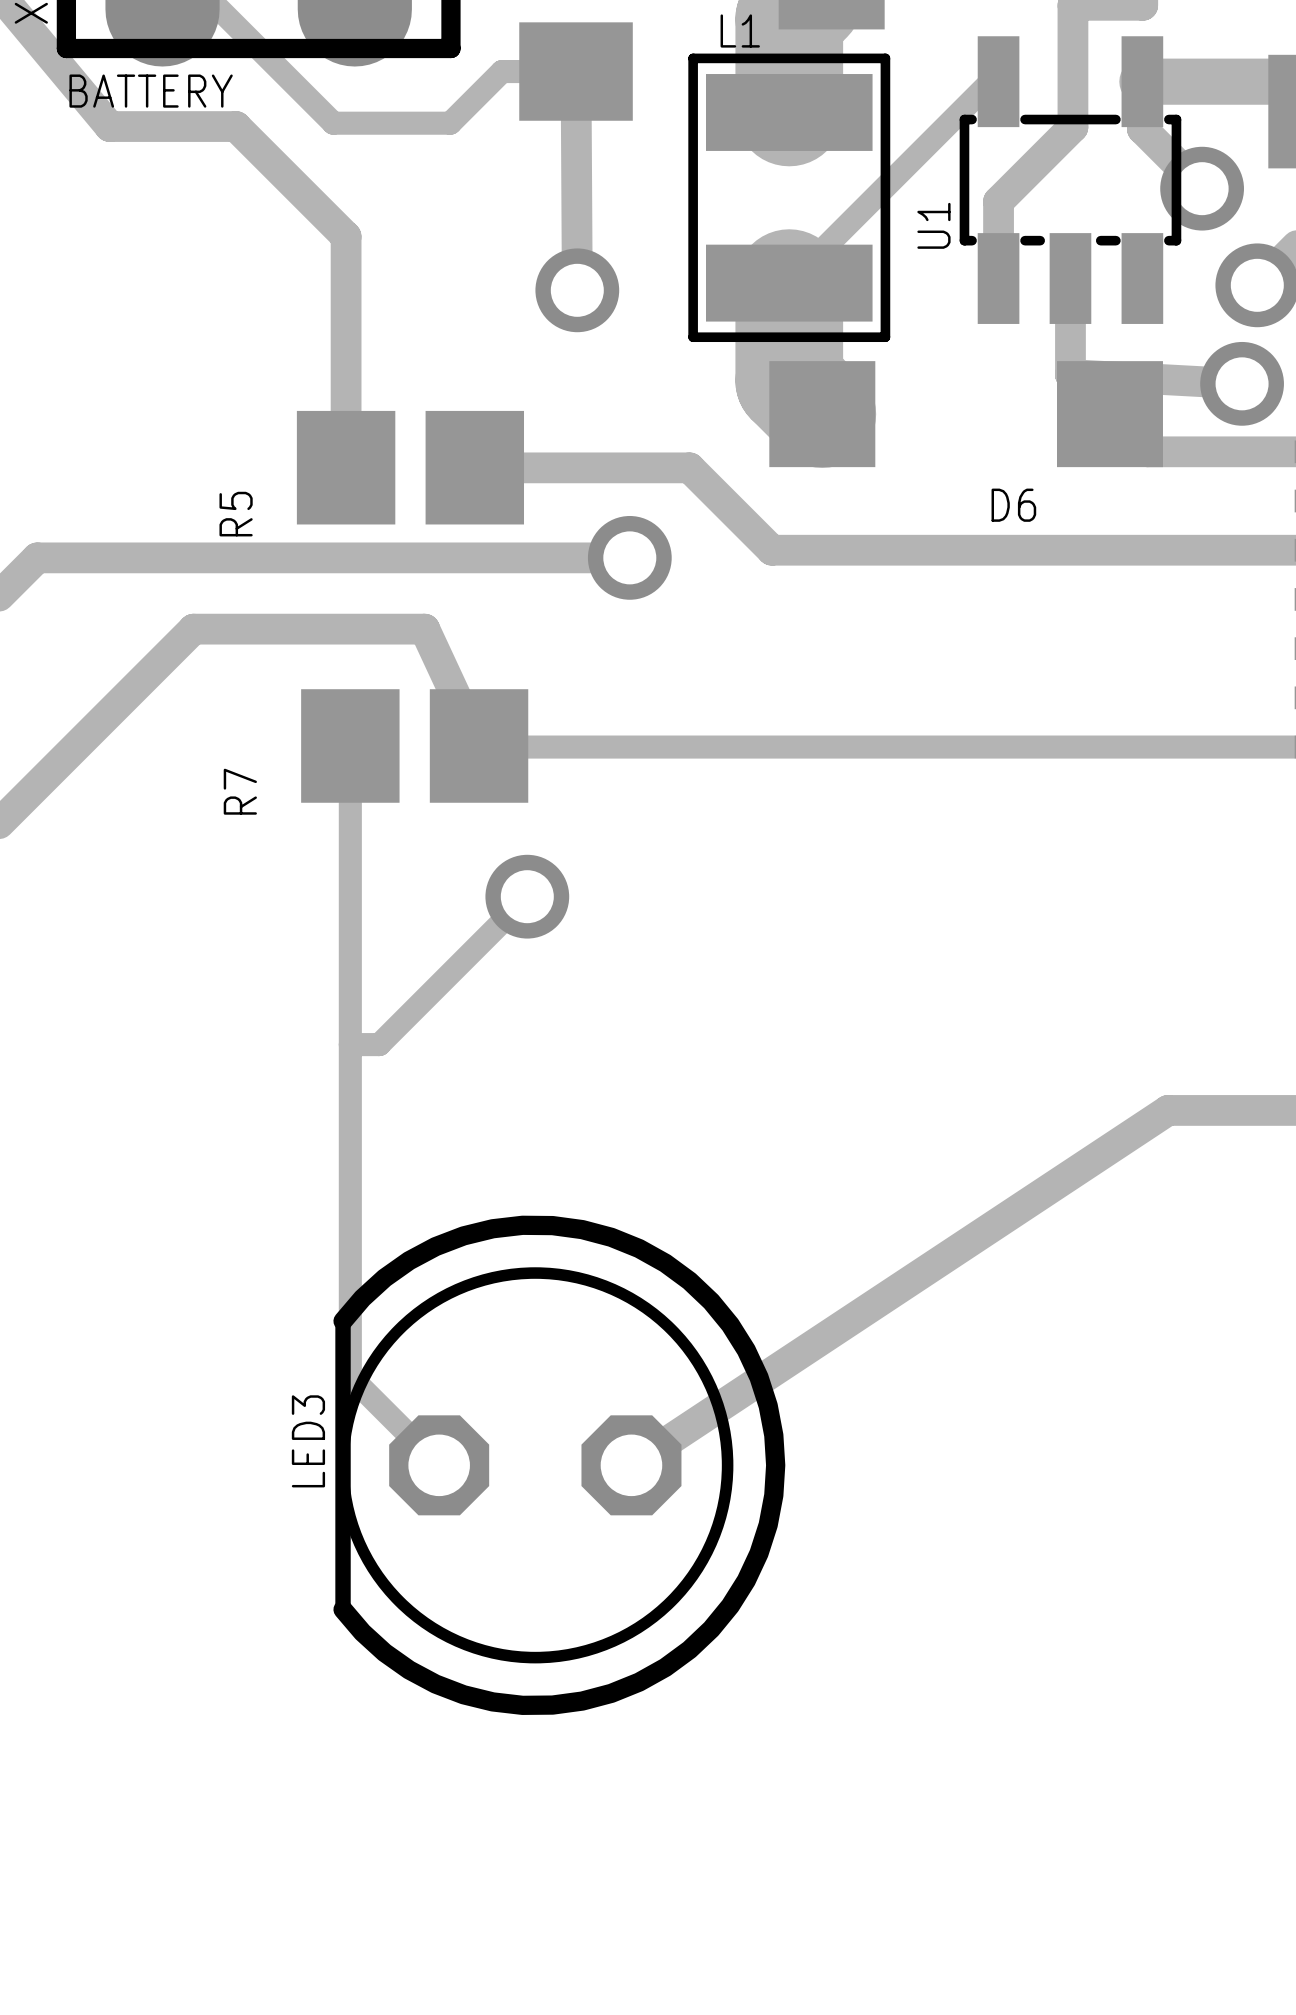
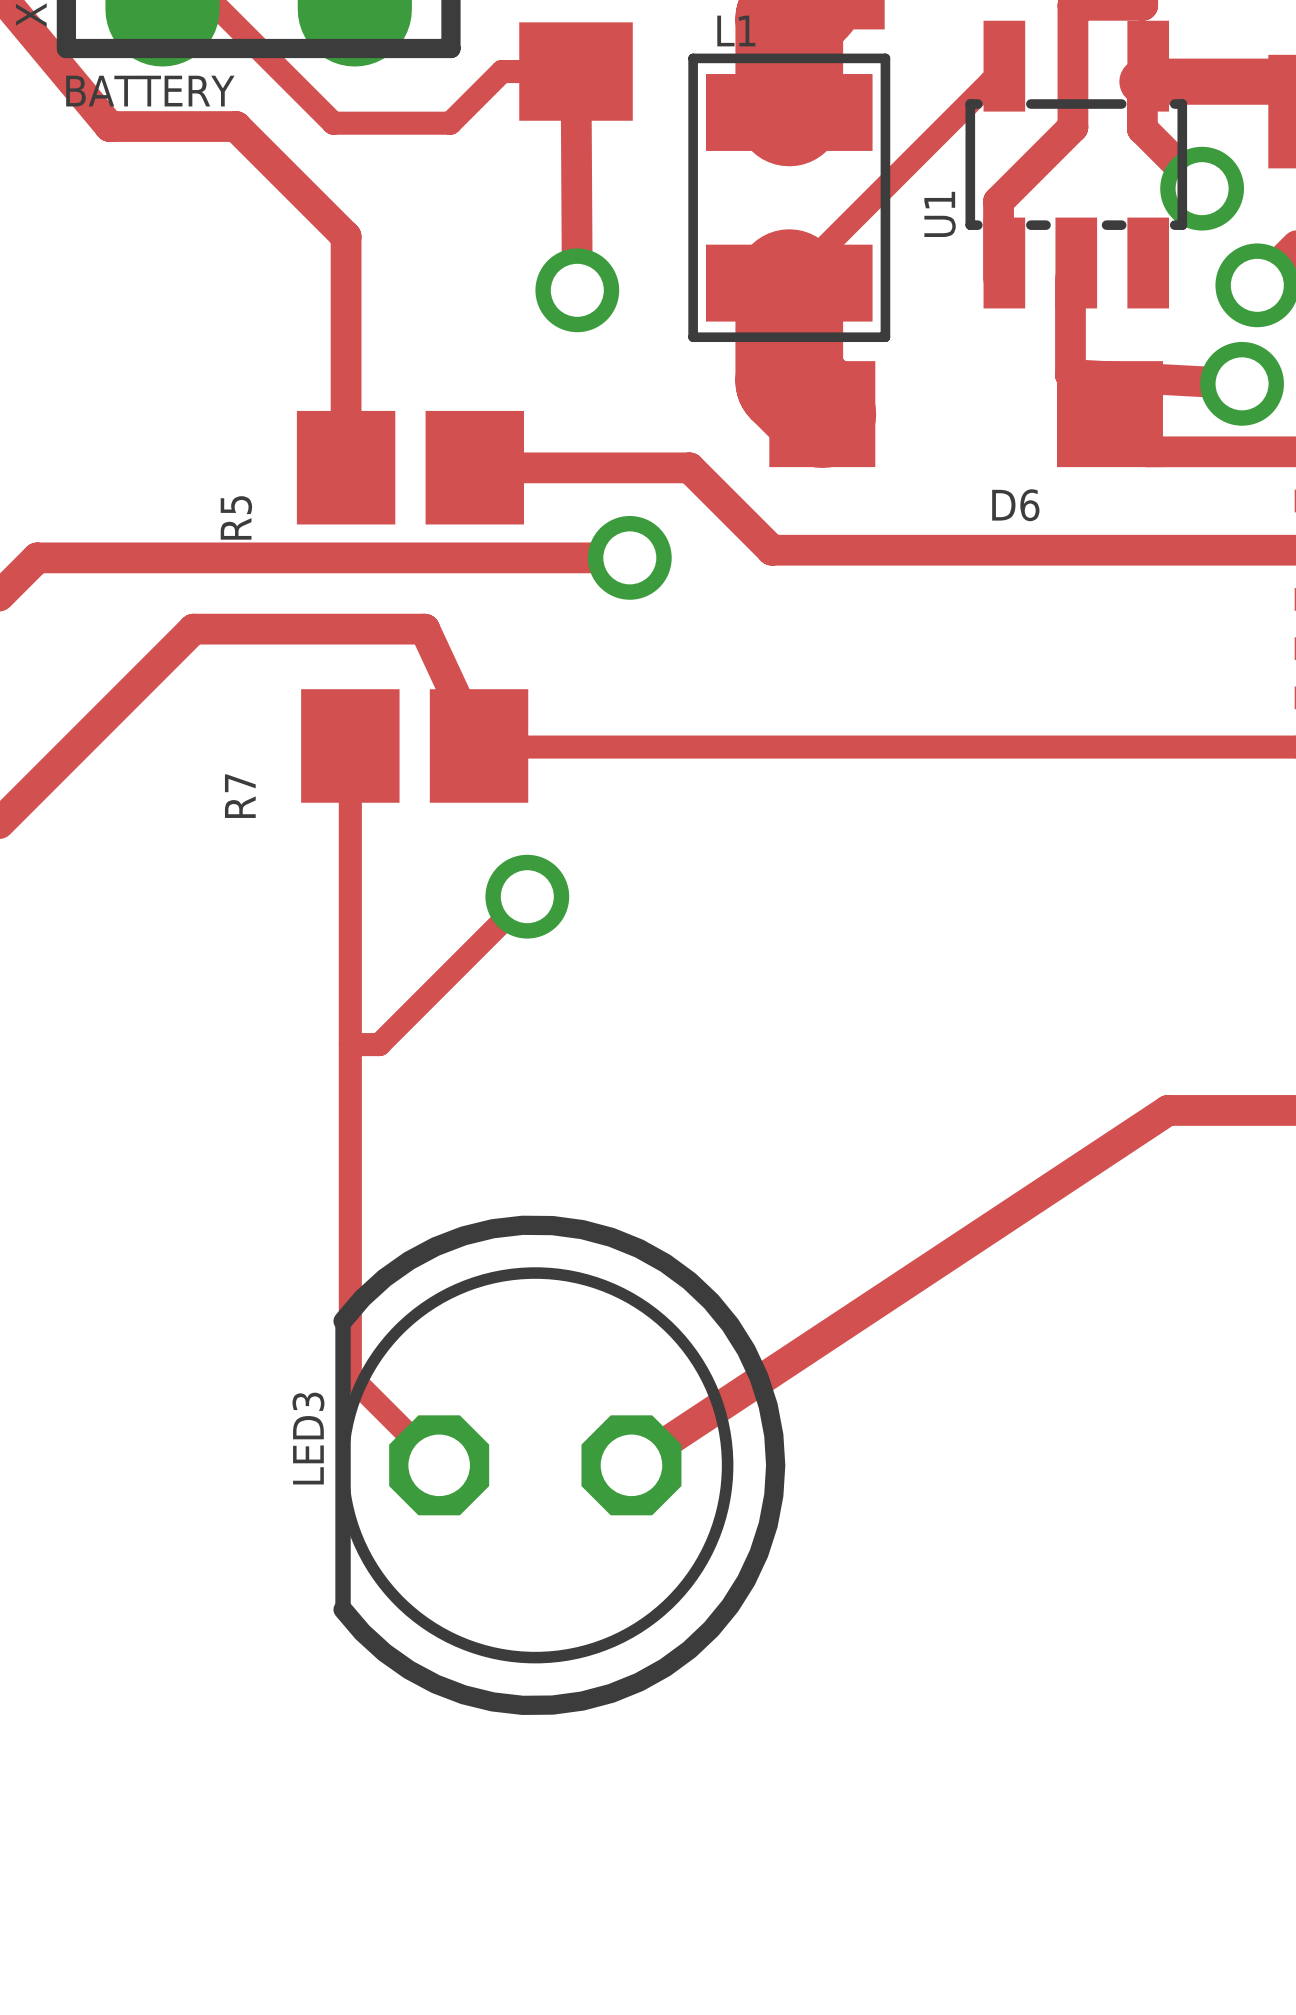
U1 position: (1070, 180) -> (1076, 164)

